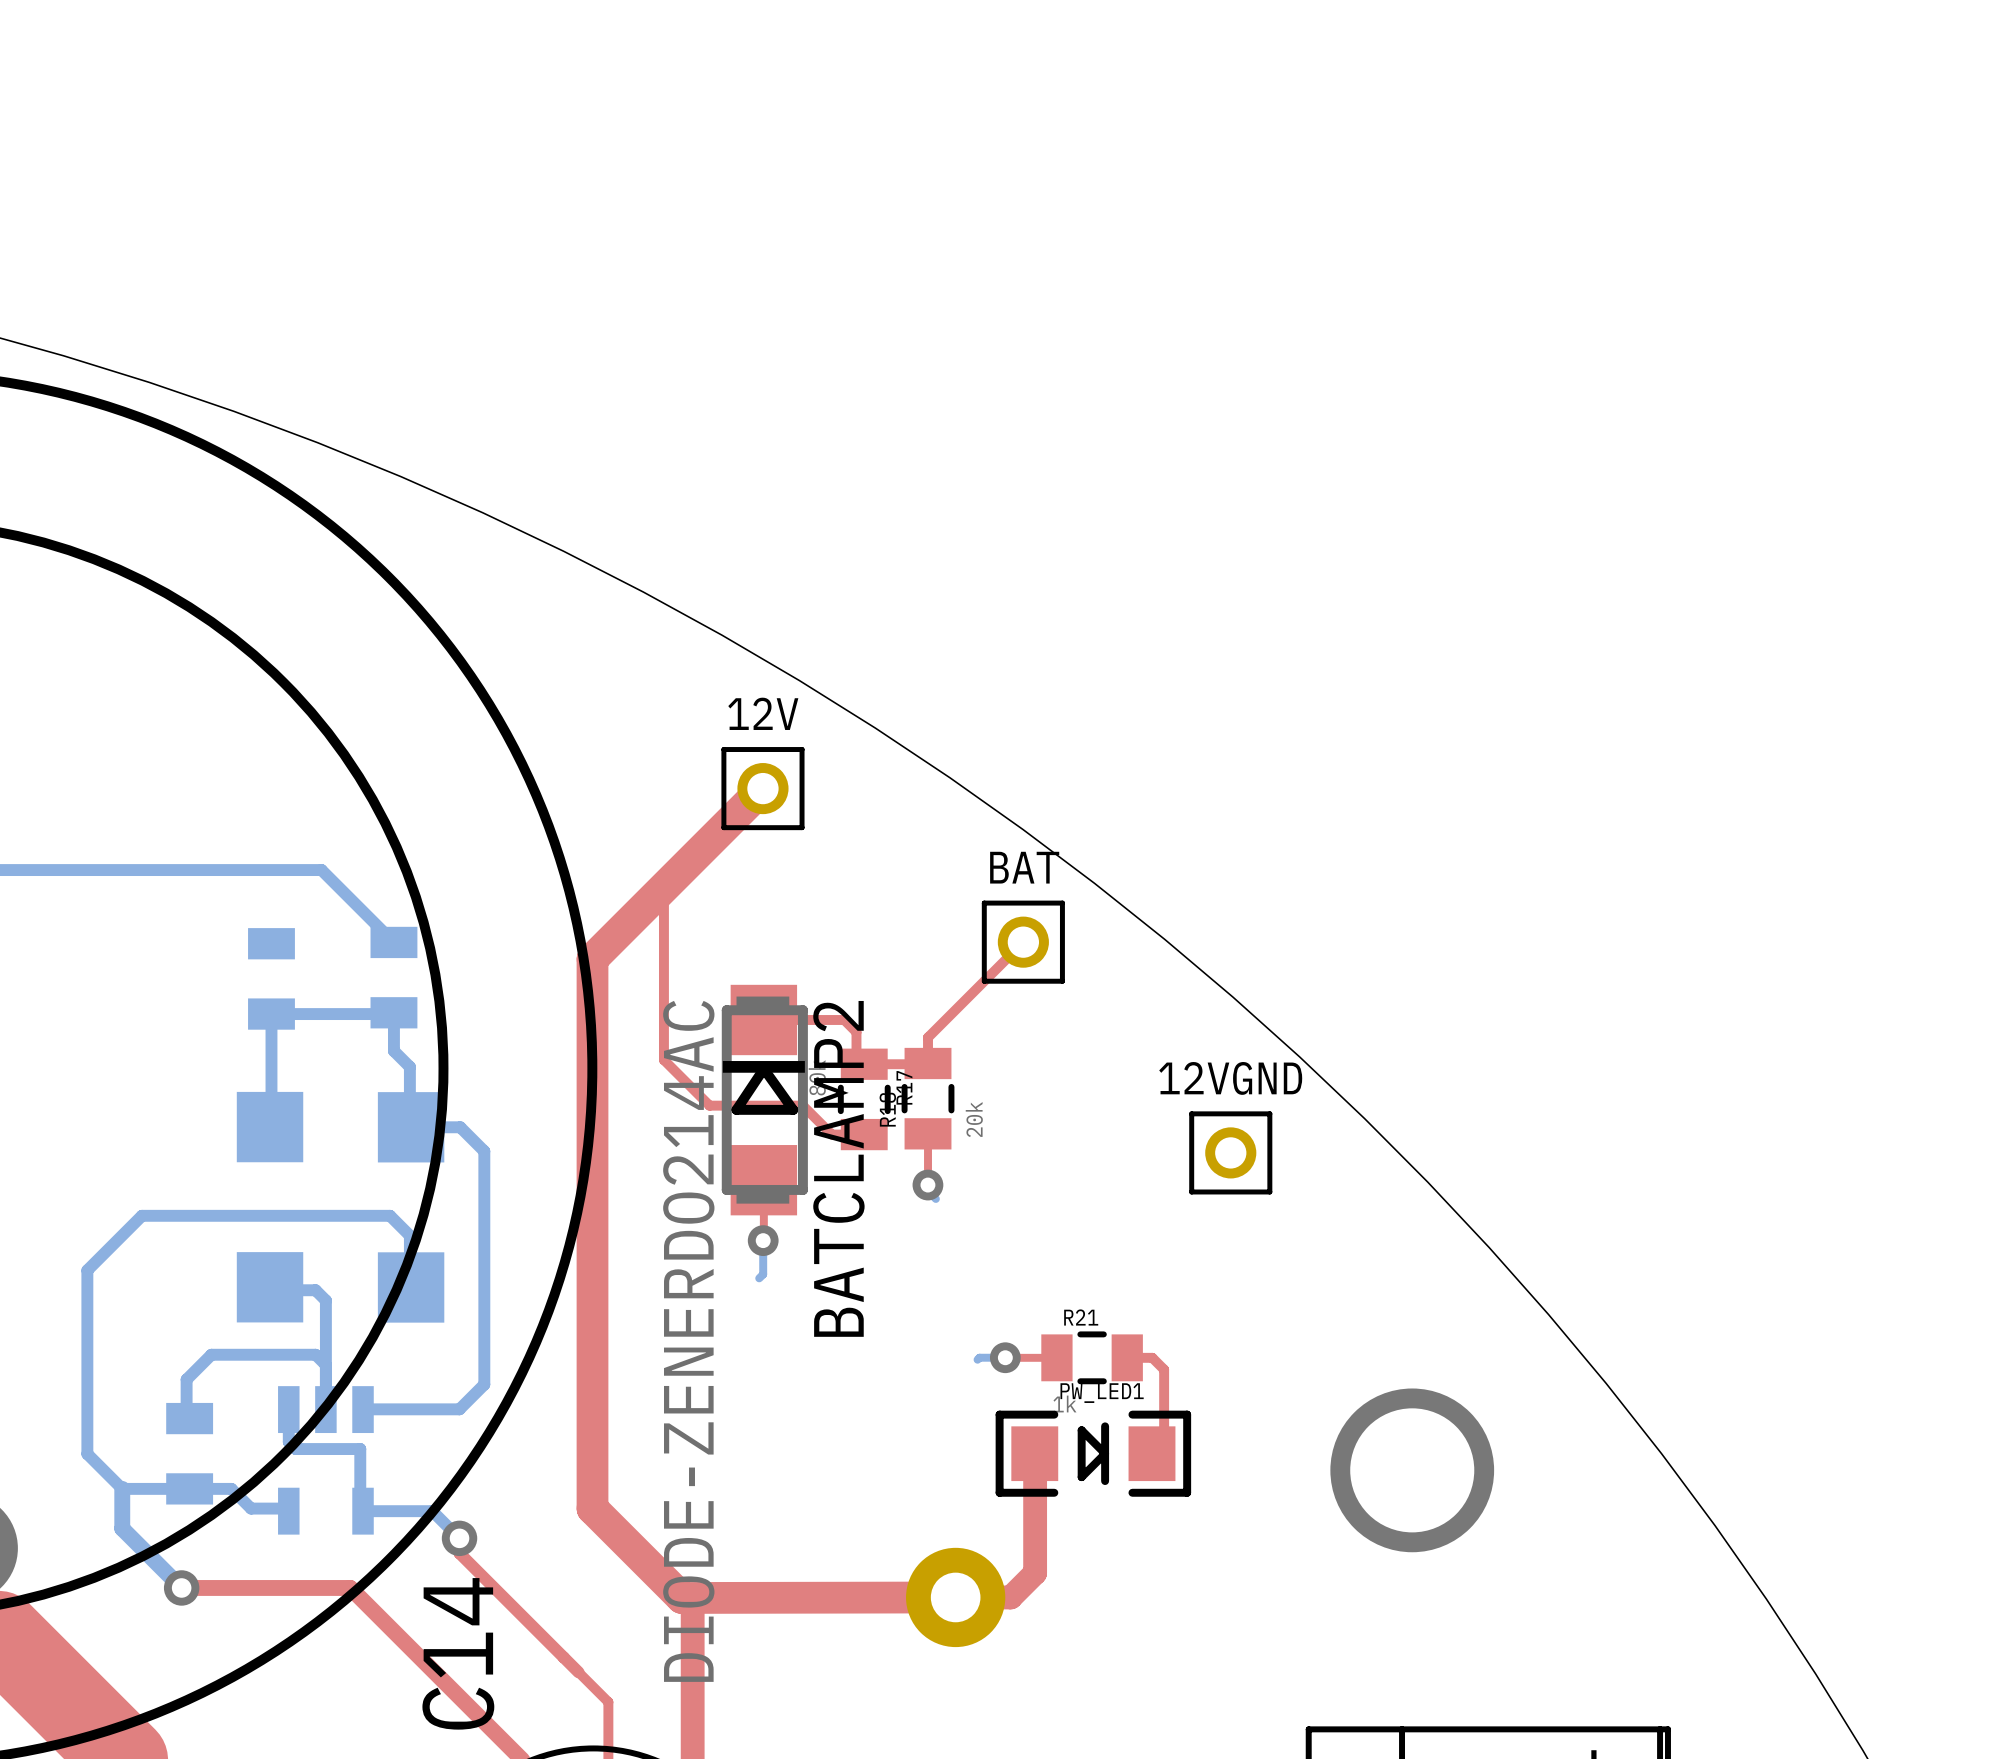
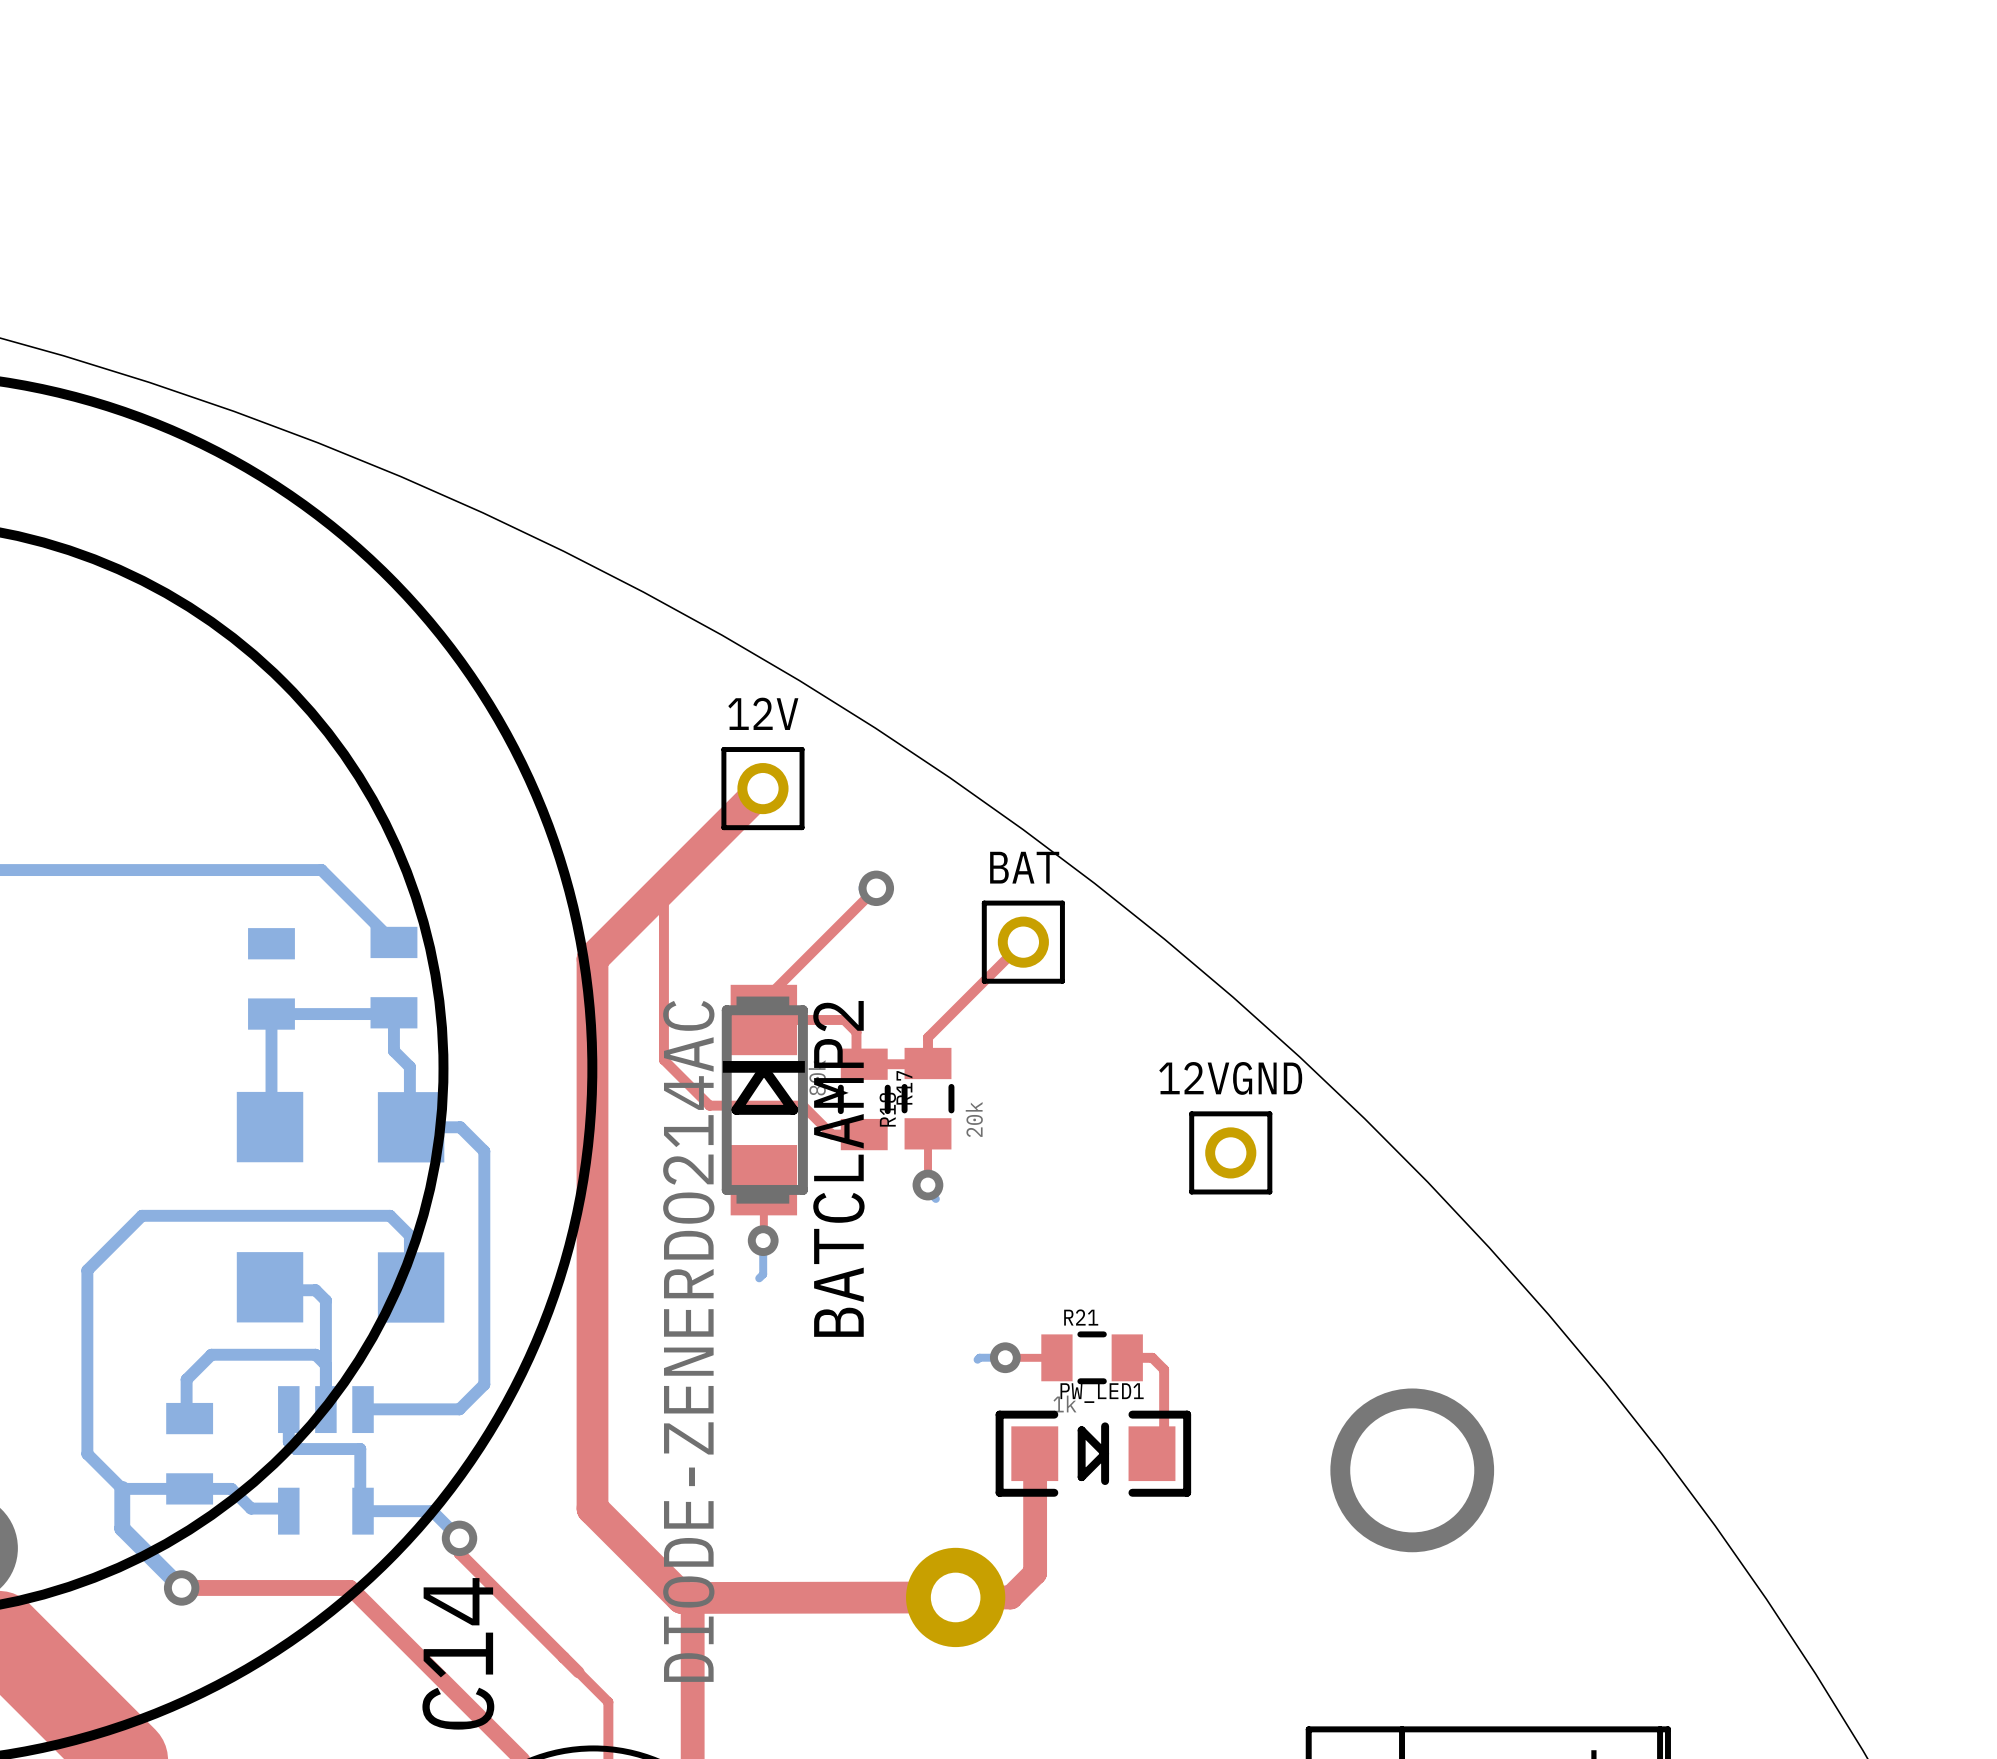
top track: none -> (876, 888) (763, 1000) (763, 1019)
via: none -> (876, 888)

